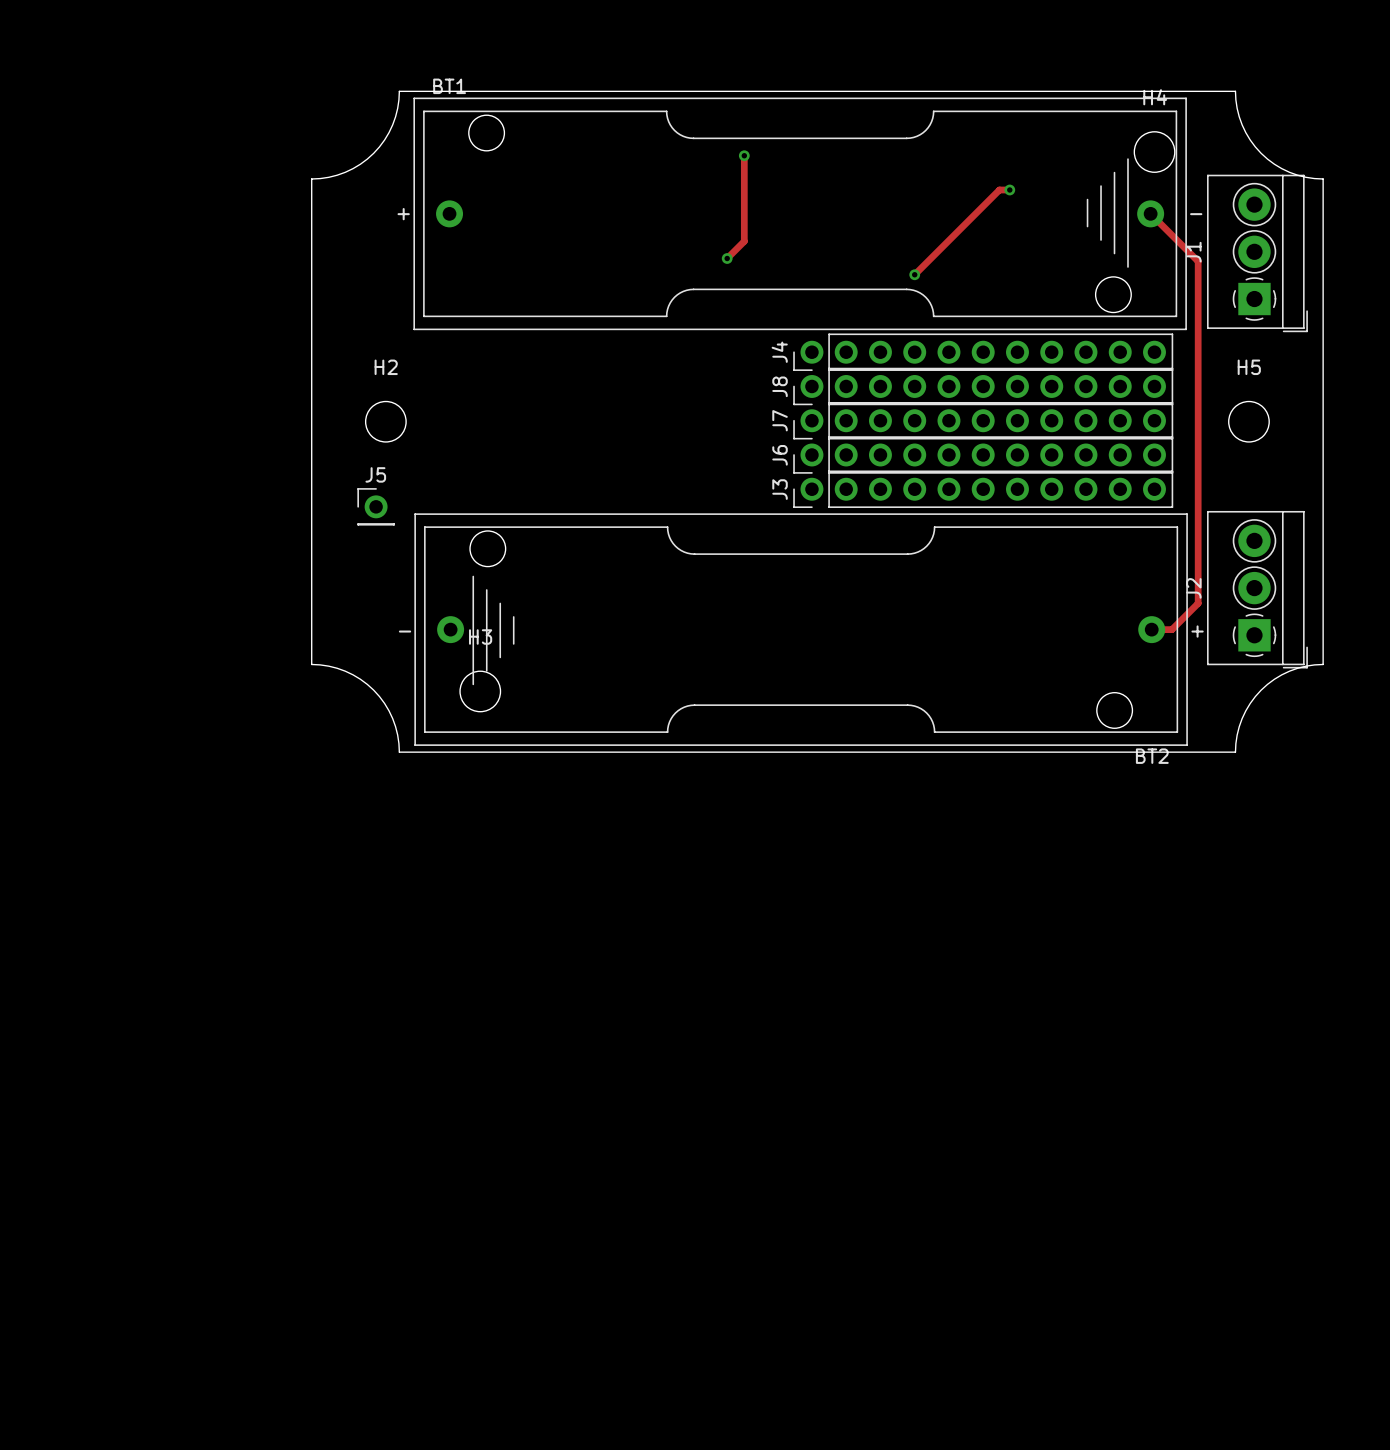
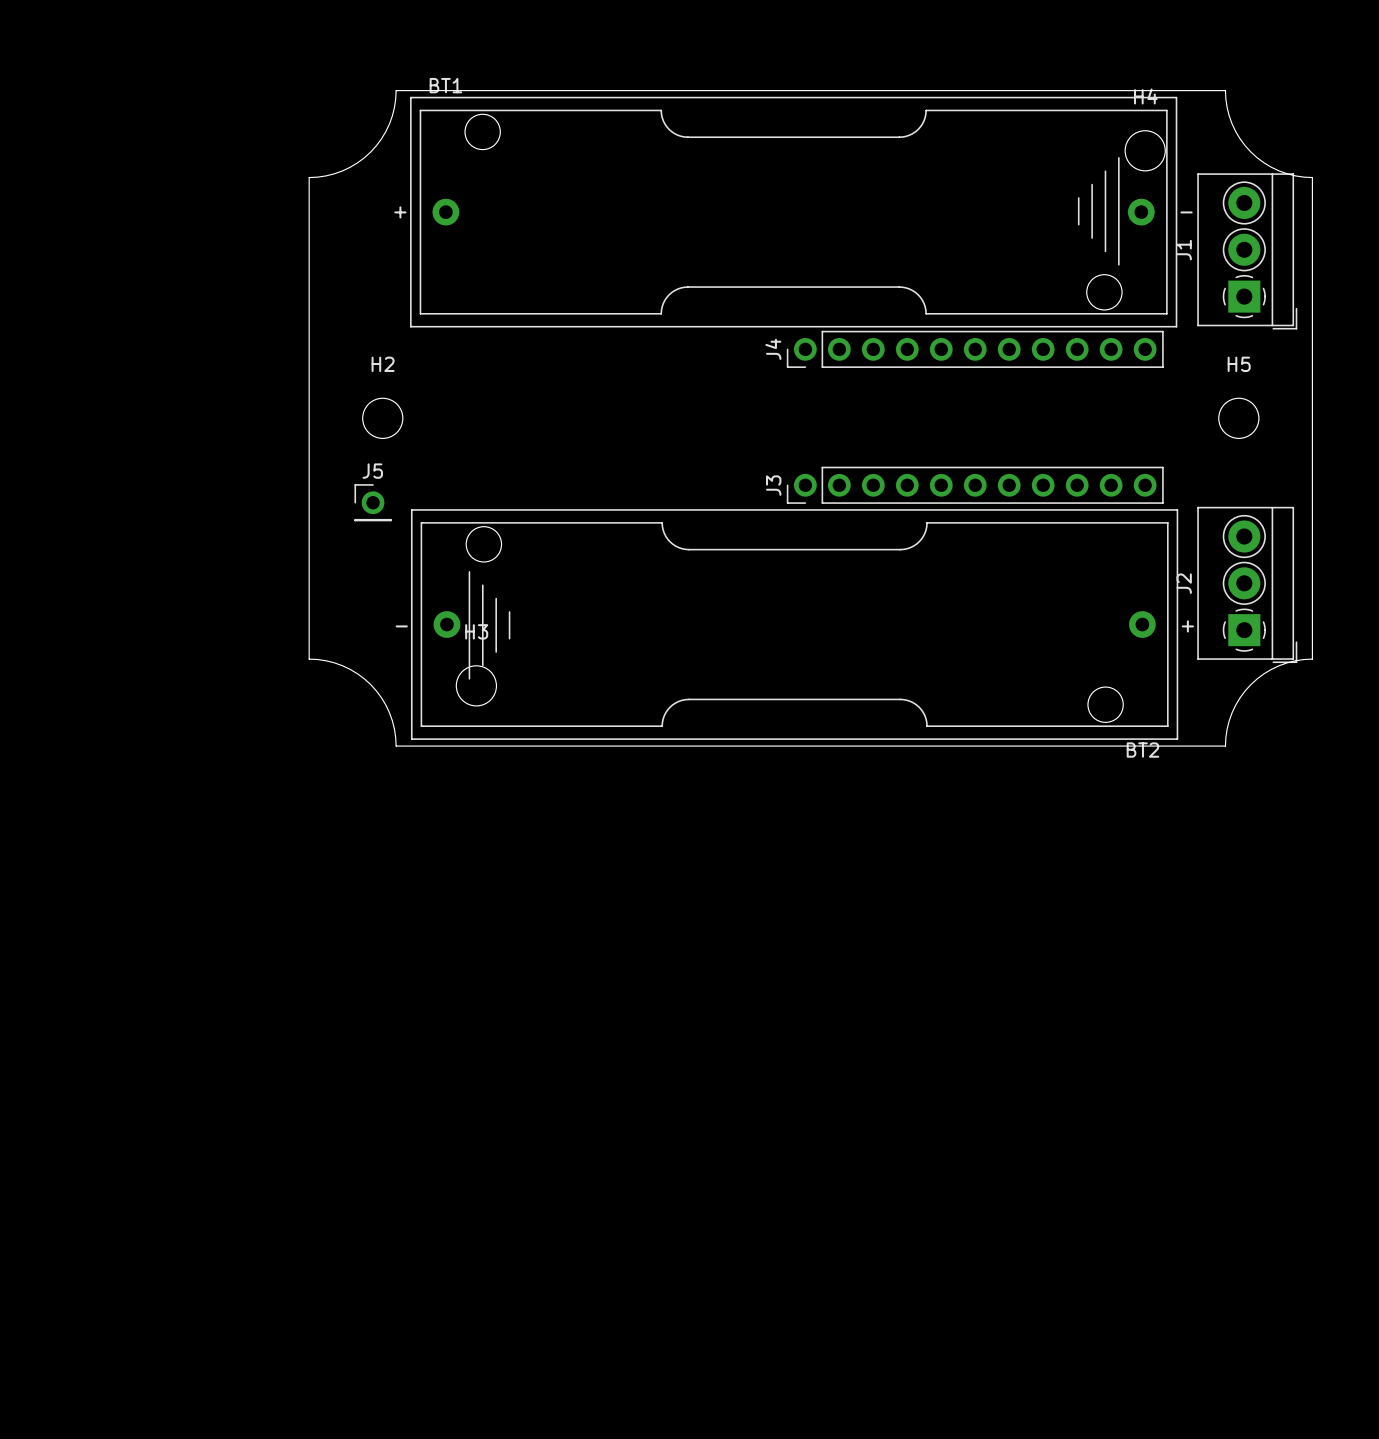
track: (744, 155) (744, 241) (727, 258) -> none
via: (744, 155) -> none
track: (1009, 189) (999, 189) (914, 274) -> none
via: (1009, 189) -> none
track: (1150, 213) (1198, 261) (1198, 603) (1171, 629) (1151, 629) -> none
via: (727, 258) -> none
via: (914, 274) -> none
J8: (983, 386) -> none
J7: (983, 420) -> none
J6: (983, 454) -> none

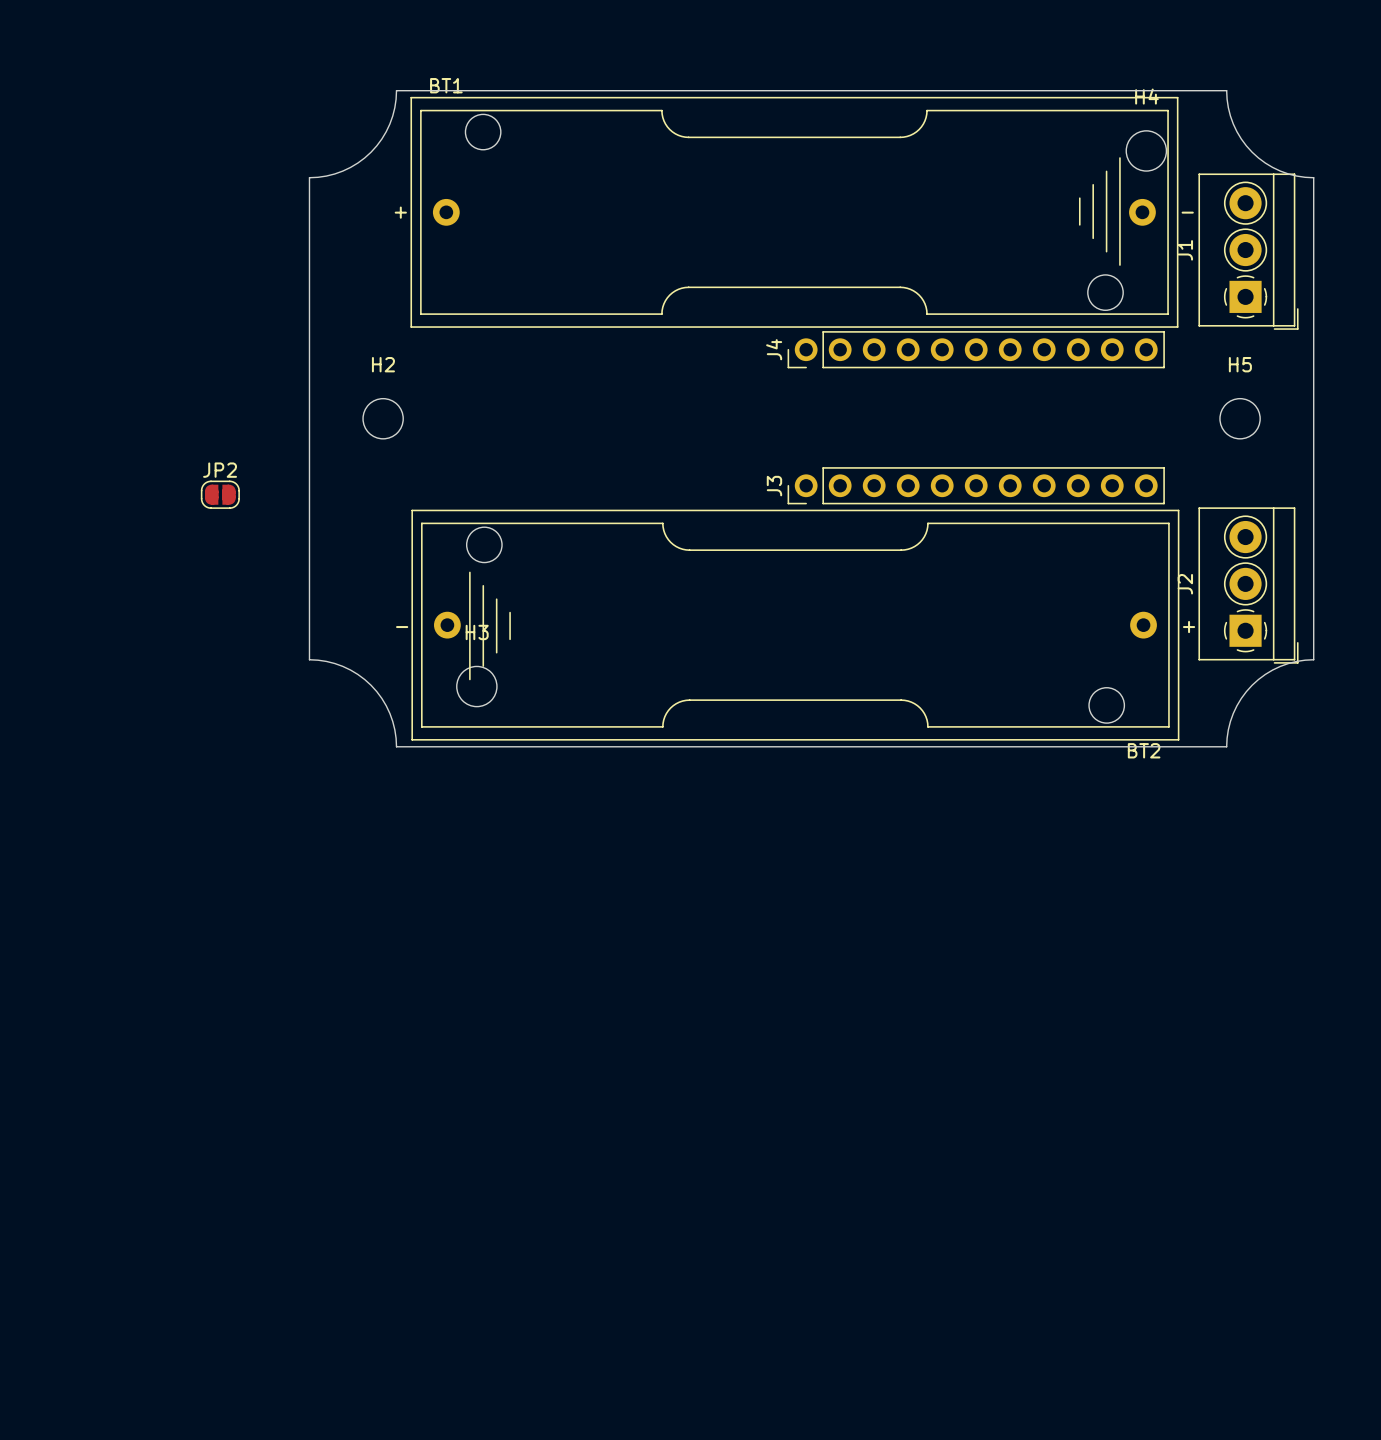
JP2: none -> (220, 494)
J5: (373, 502) -> none

